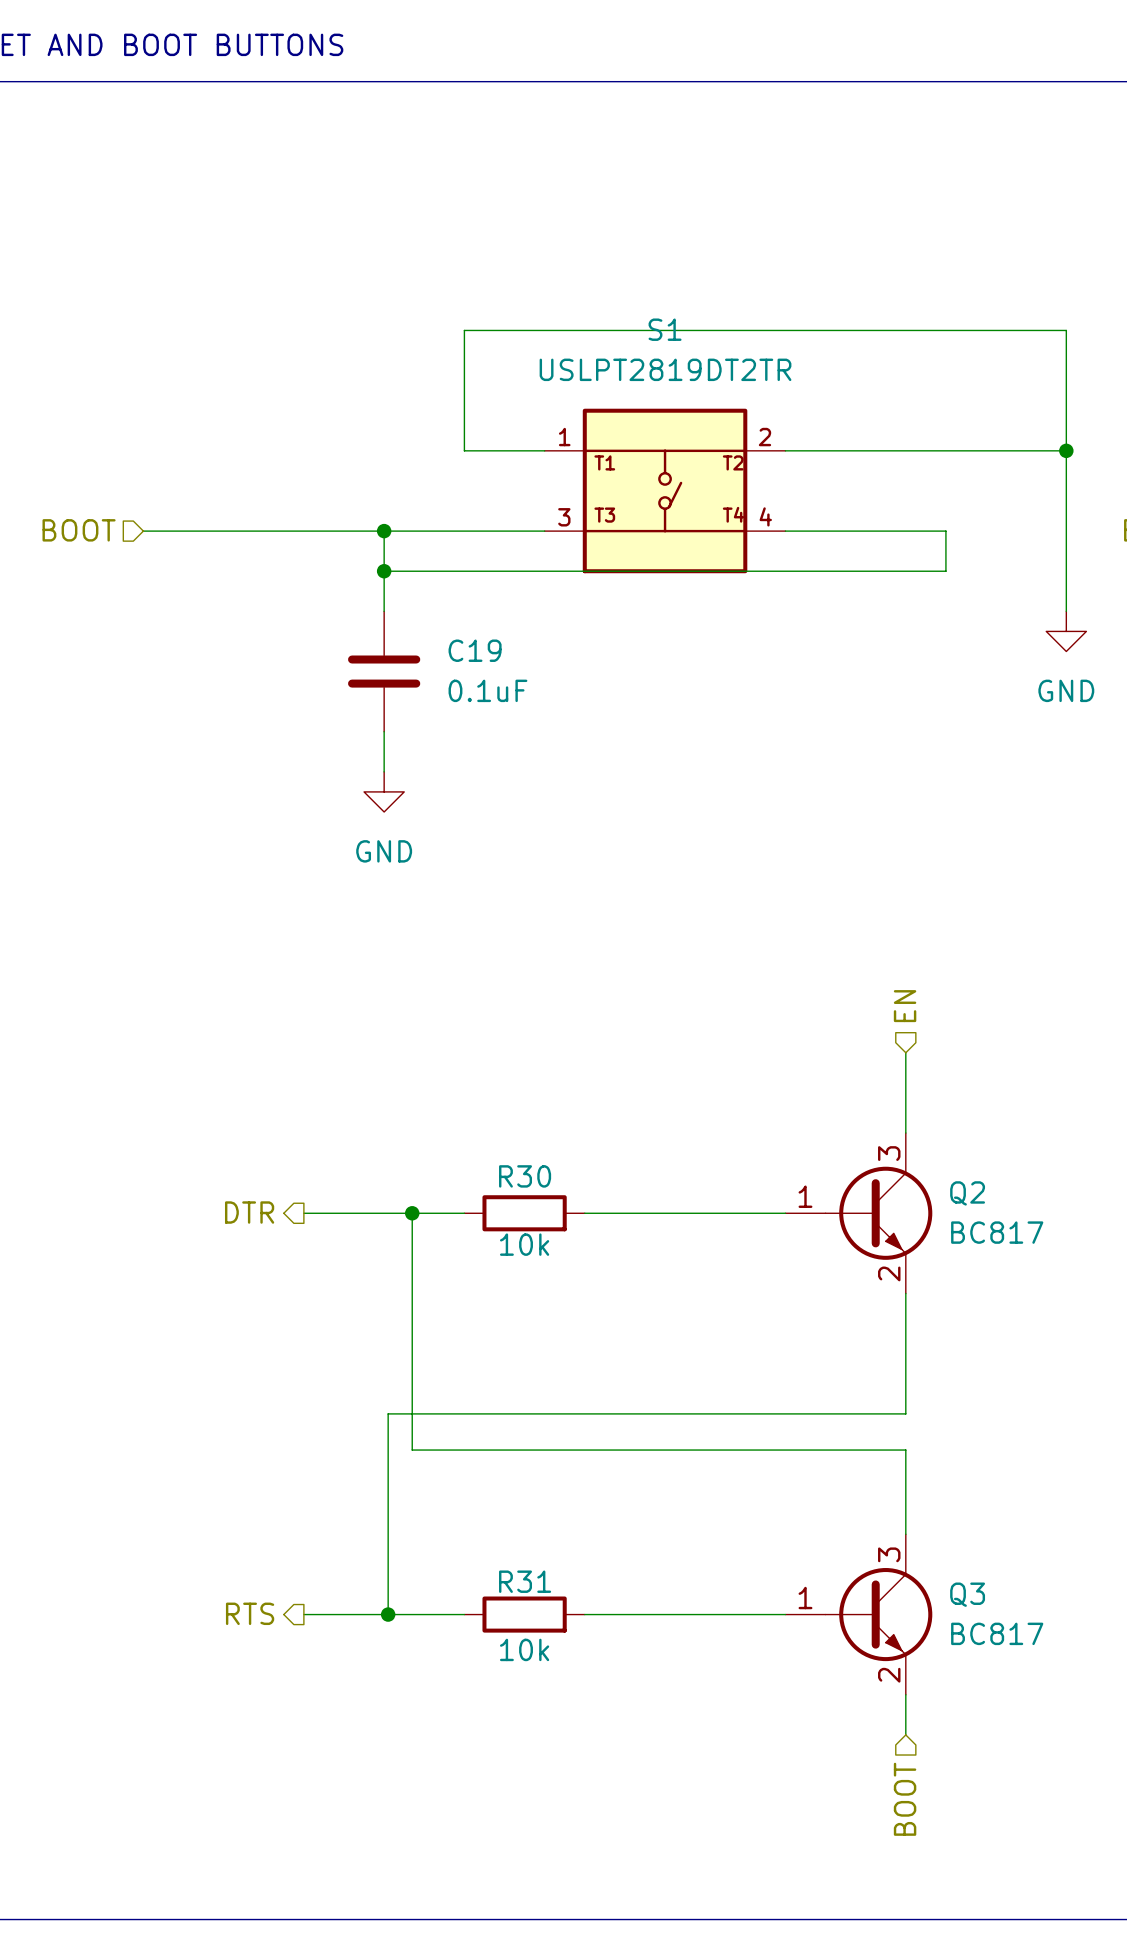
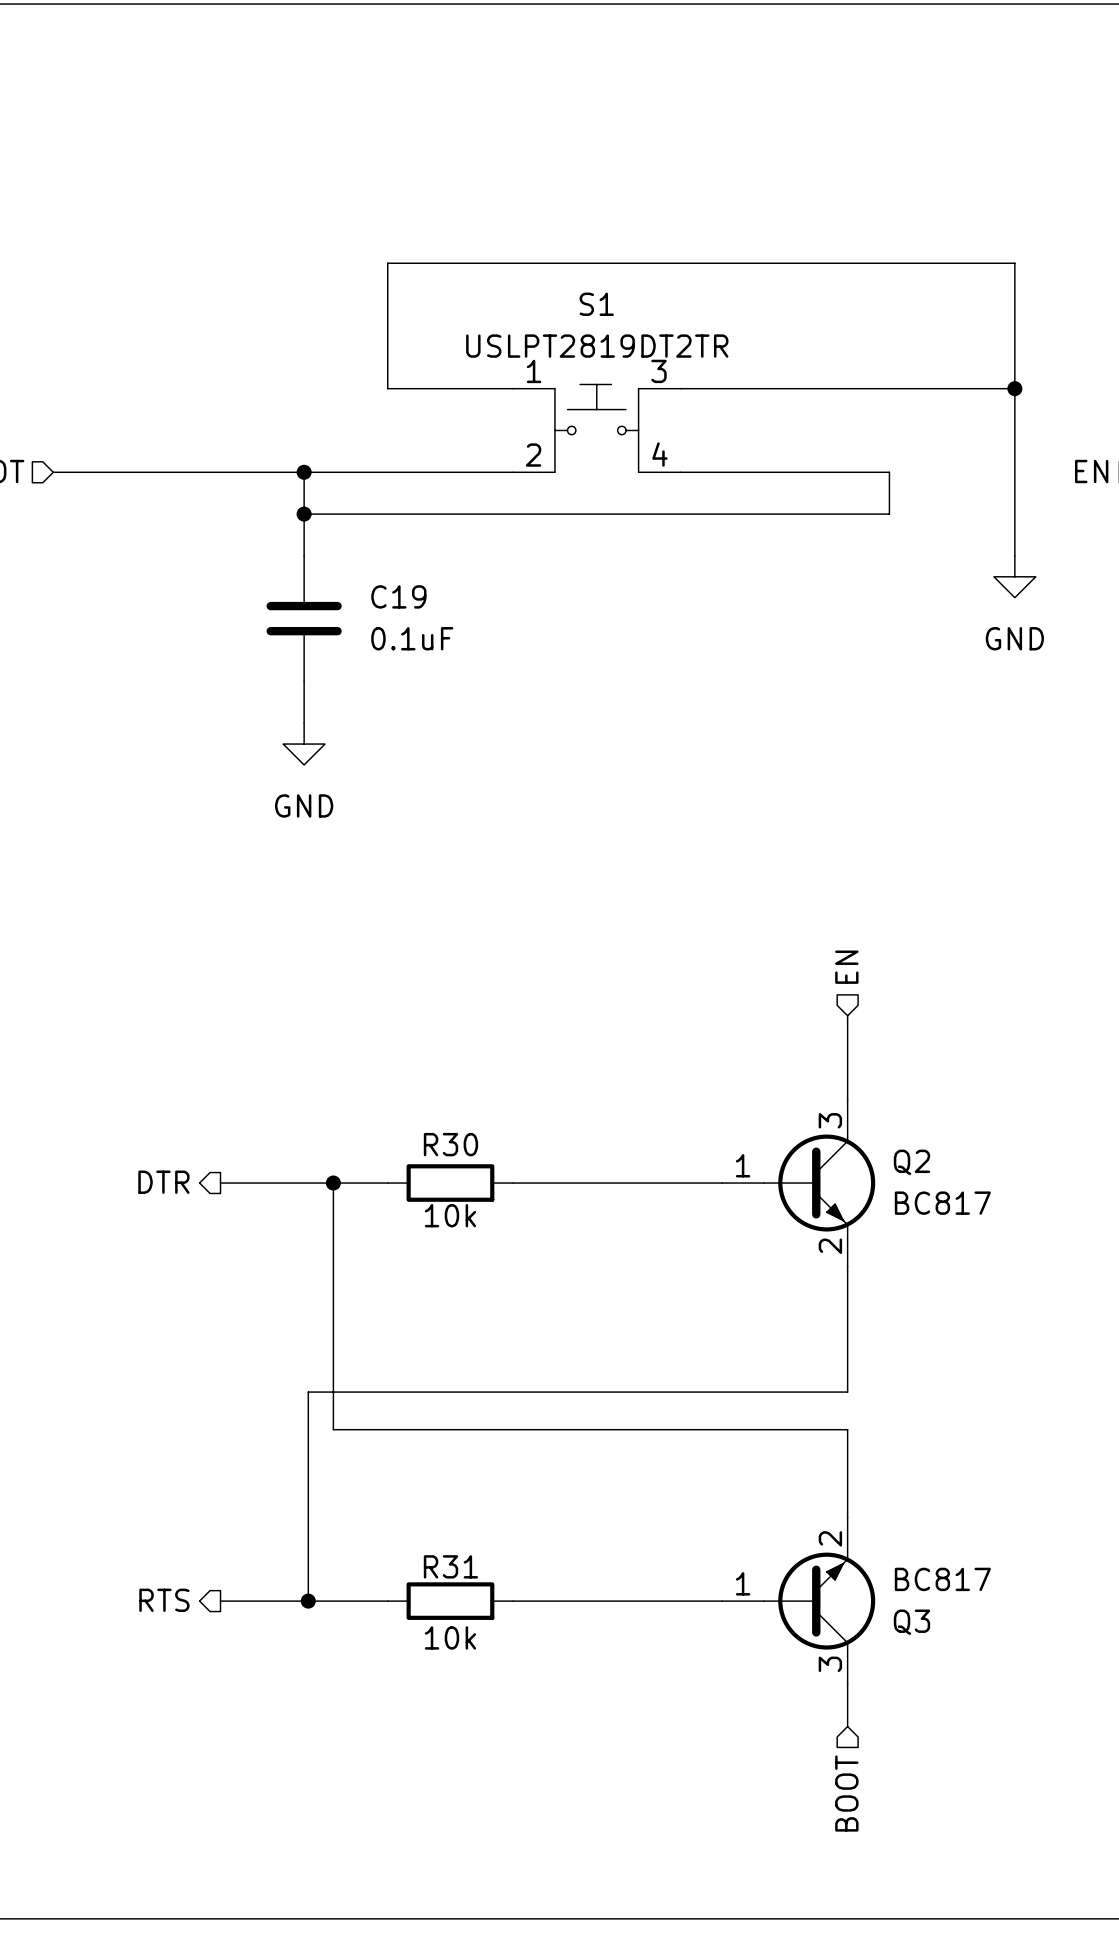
S1 name position: S1 (665, 329) -> S1 (596, 304)
S1 value position: USLPT2819DT2TR (665, 369) -> USLPT2819DT2TR (597, 346)
S1 symbol: [544, 408, 786, 574] -> [513, 384, 681, 473]
Q3 flip: as is (878, 1614) -> up-down (819, 1601)

